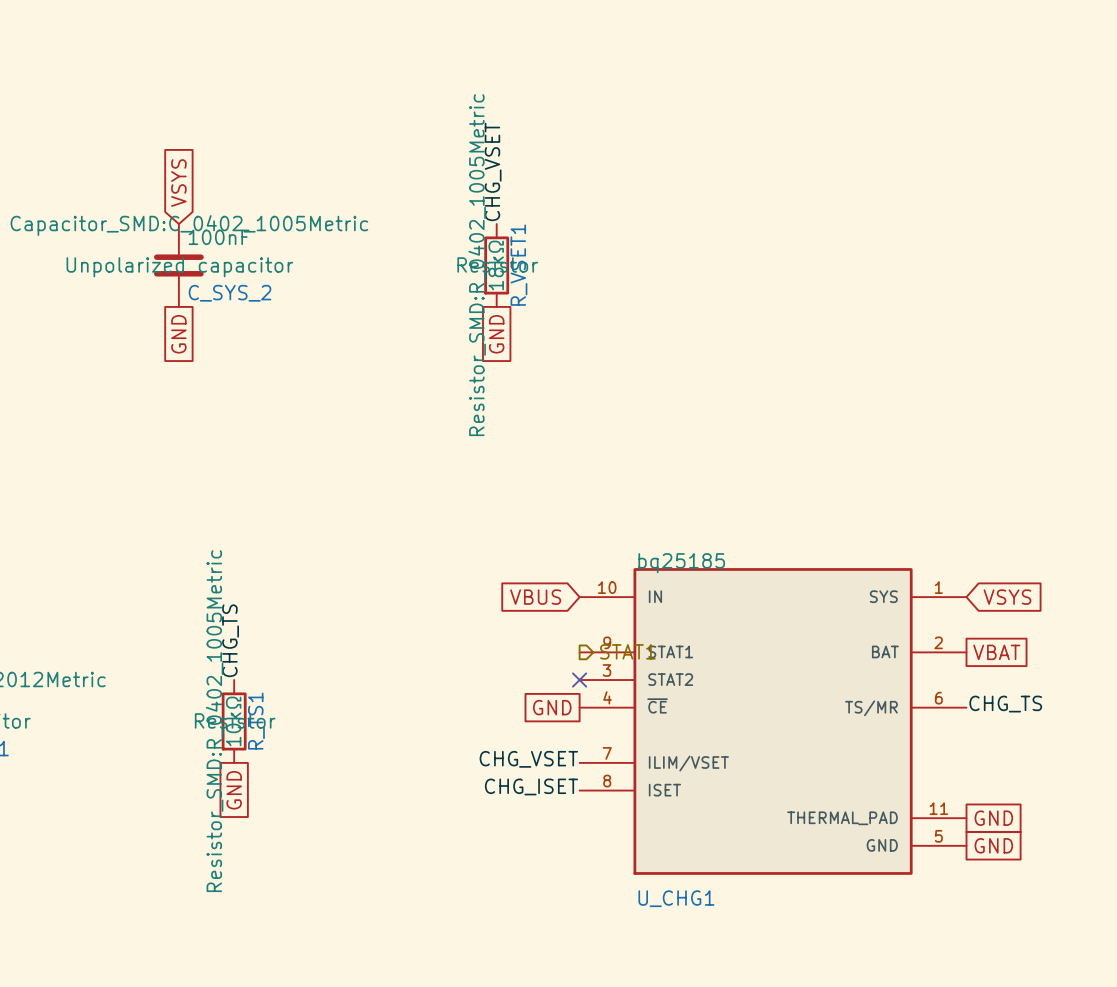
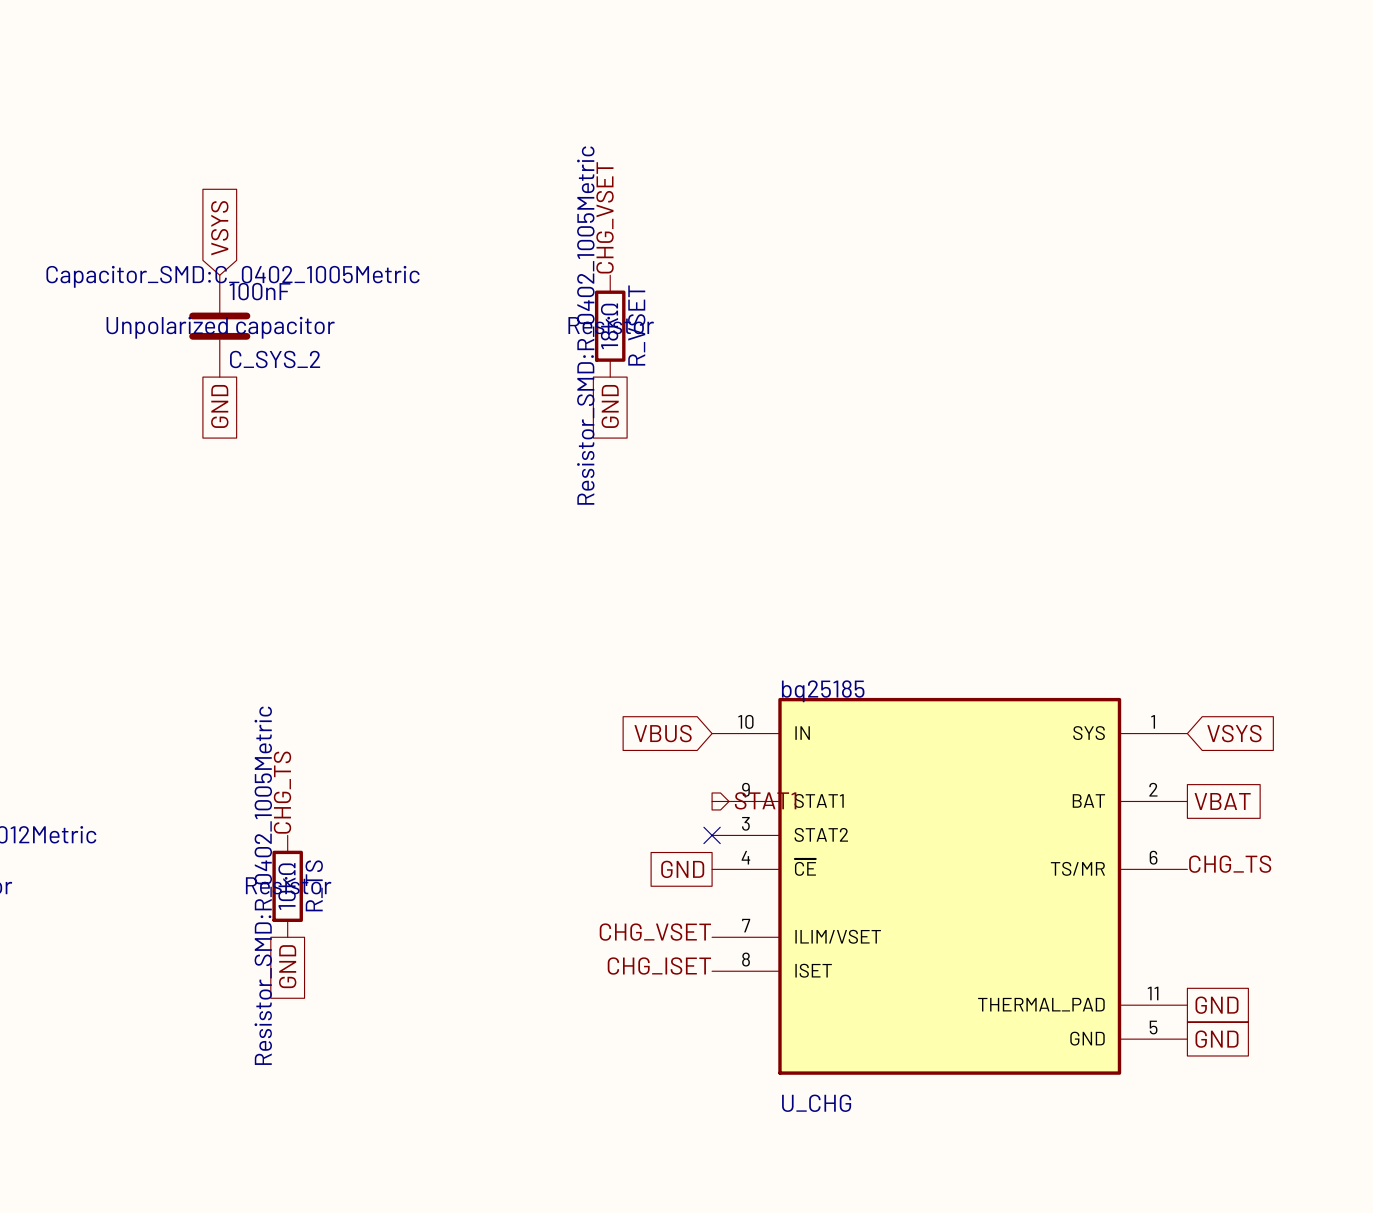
R_VSET1 name: R_VSET1 (518, 265) -> R_VSET (636, 325)
R_TS1 name: R_TS1 (256, 721) -> R_TS (314, 885)
U_CHG1 name: U_CHG1 (676, 898) -> U_CHG (816, 1103)

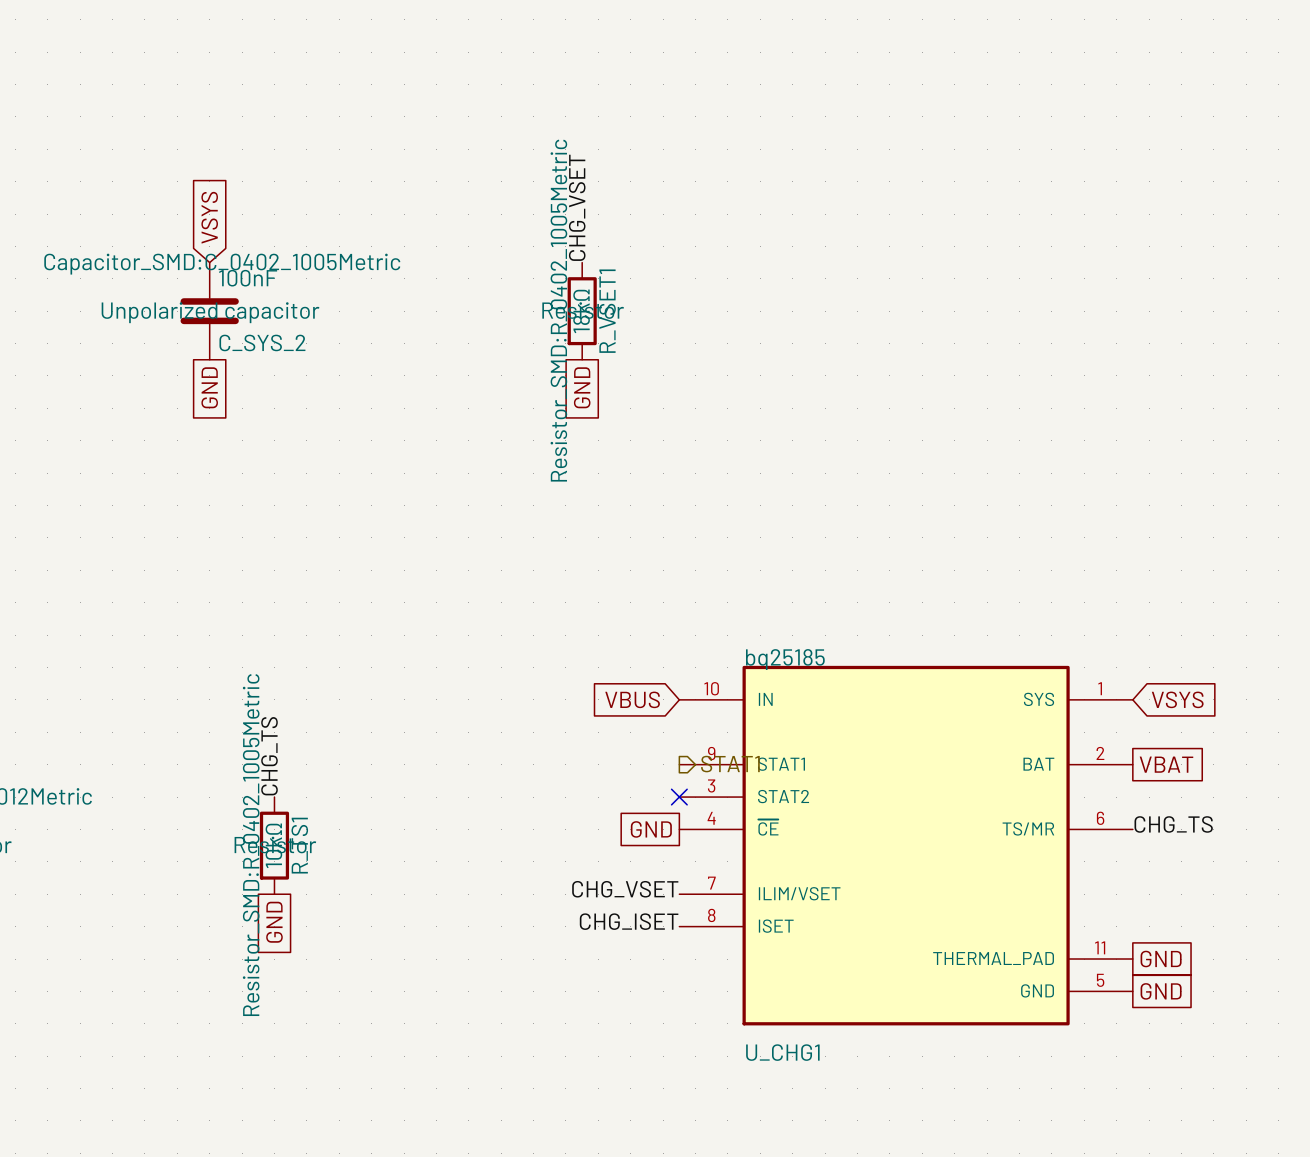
R_VSET name: R_VSET (636, 325) -> R_VSET1 (607, 311)
R_TS name: R_TS (314, 885) -> R_TS1 (299, 845)
U_CHG name: U_CHG (816, 1103) -> U_CHG1 (782, 1052)

